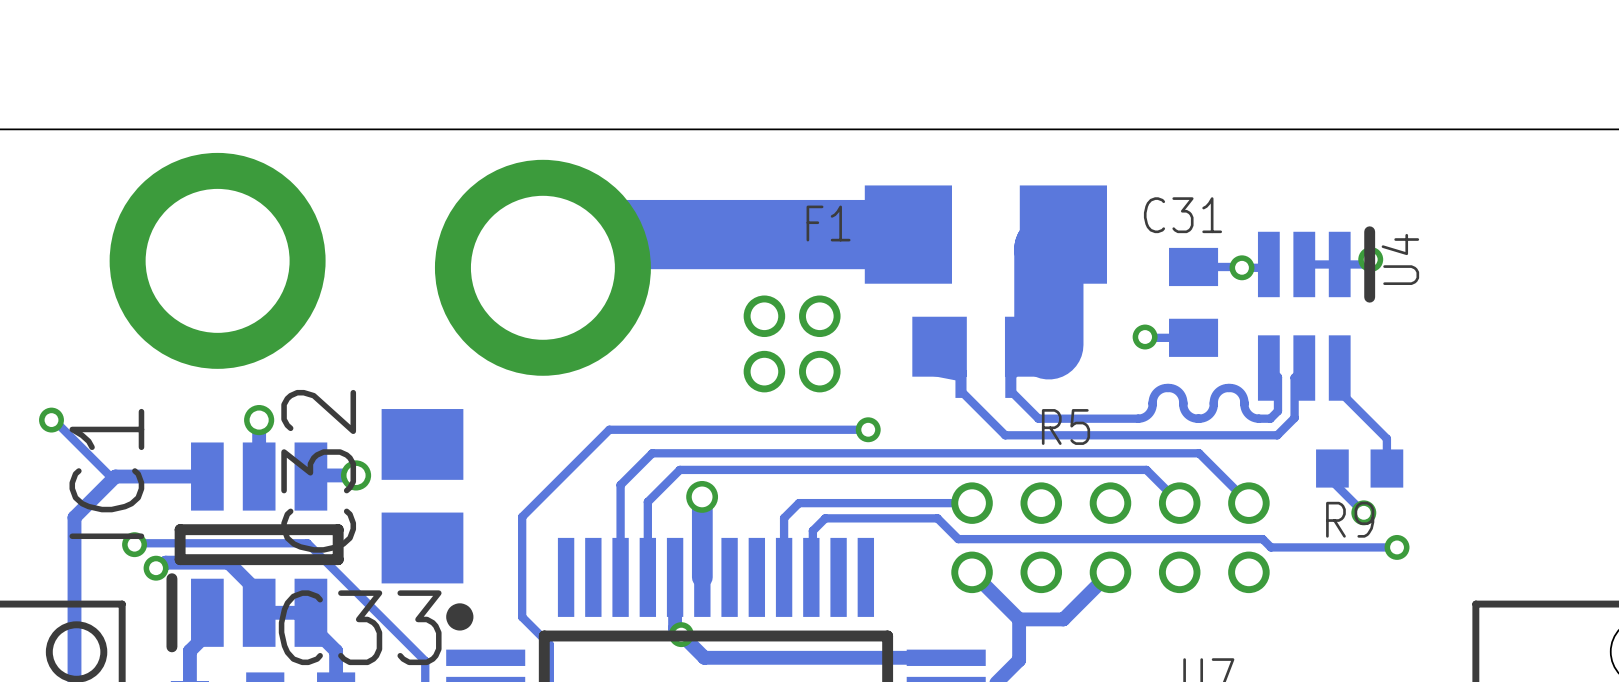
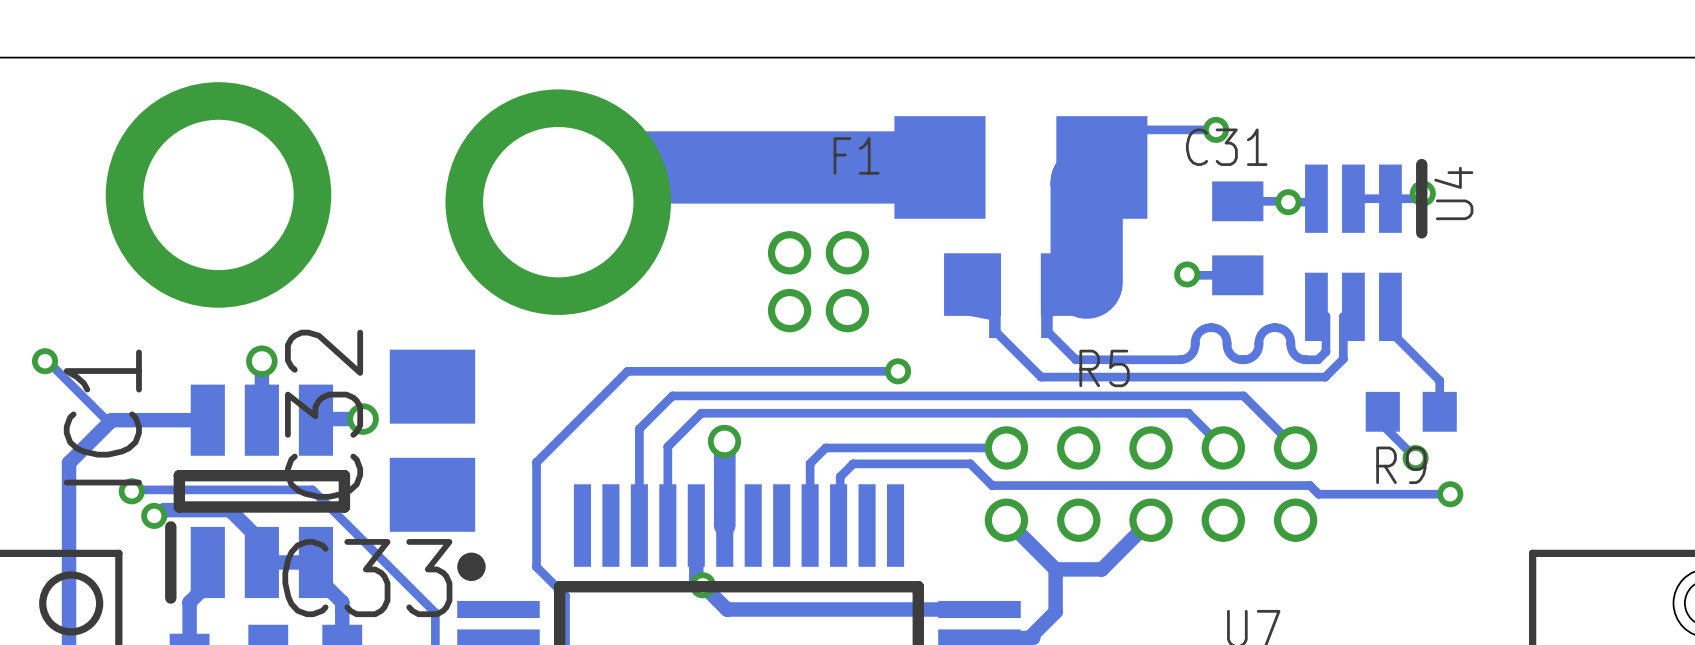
track: none -> (1216, 129) (1139, 129)
via: none -> (1216, 129)

